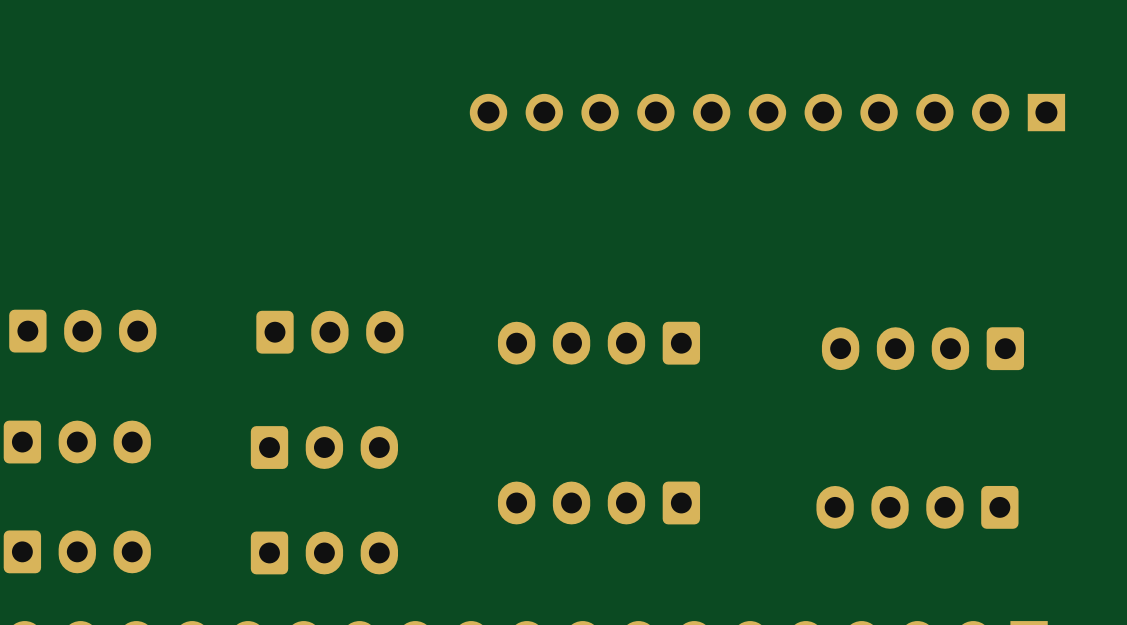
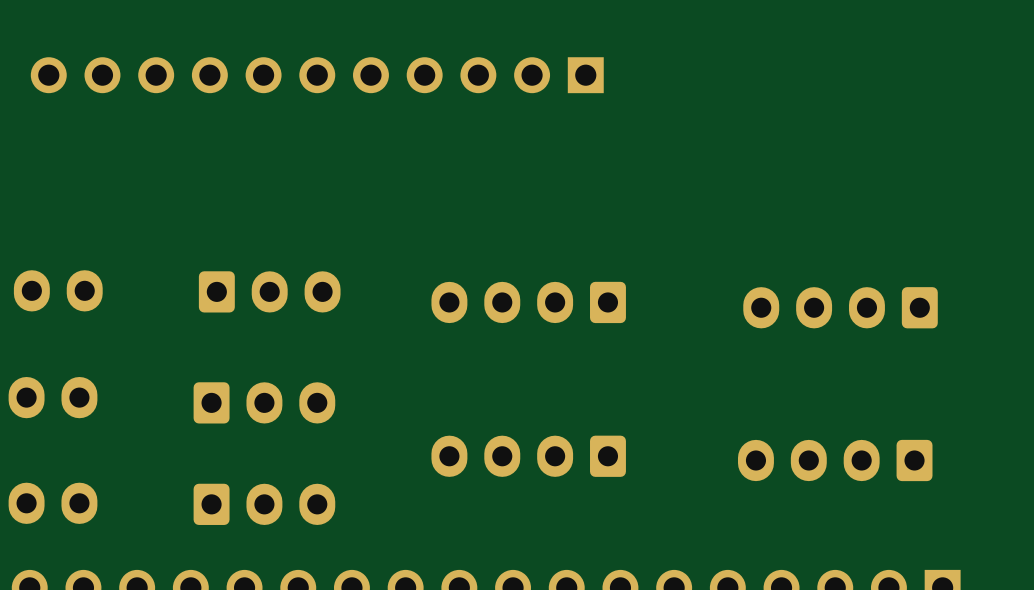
part position: (767, 112) -> (317, 75)

